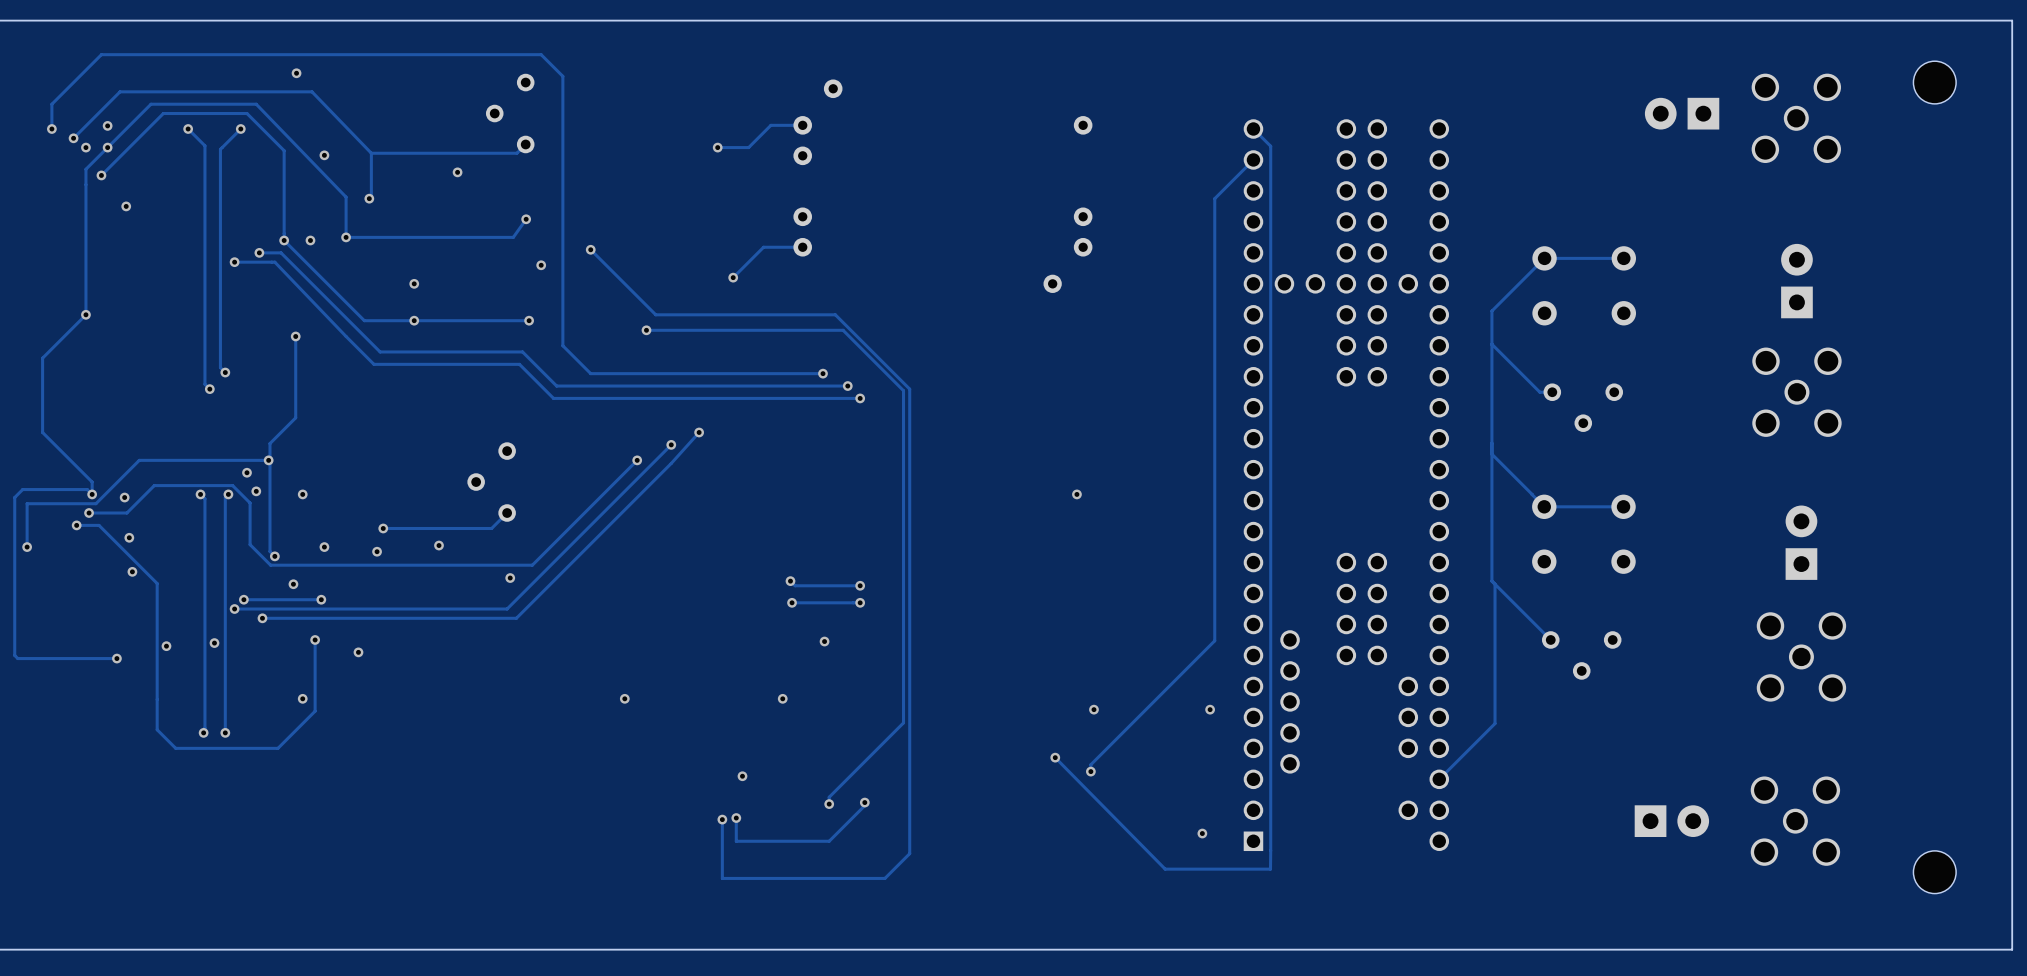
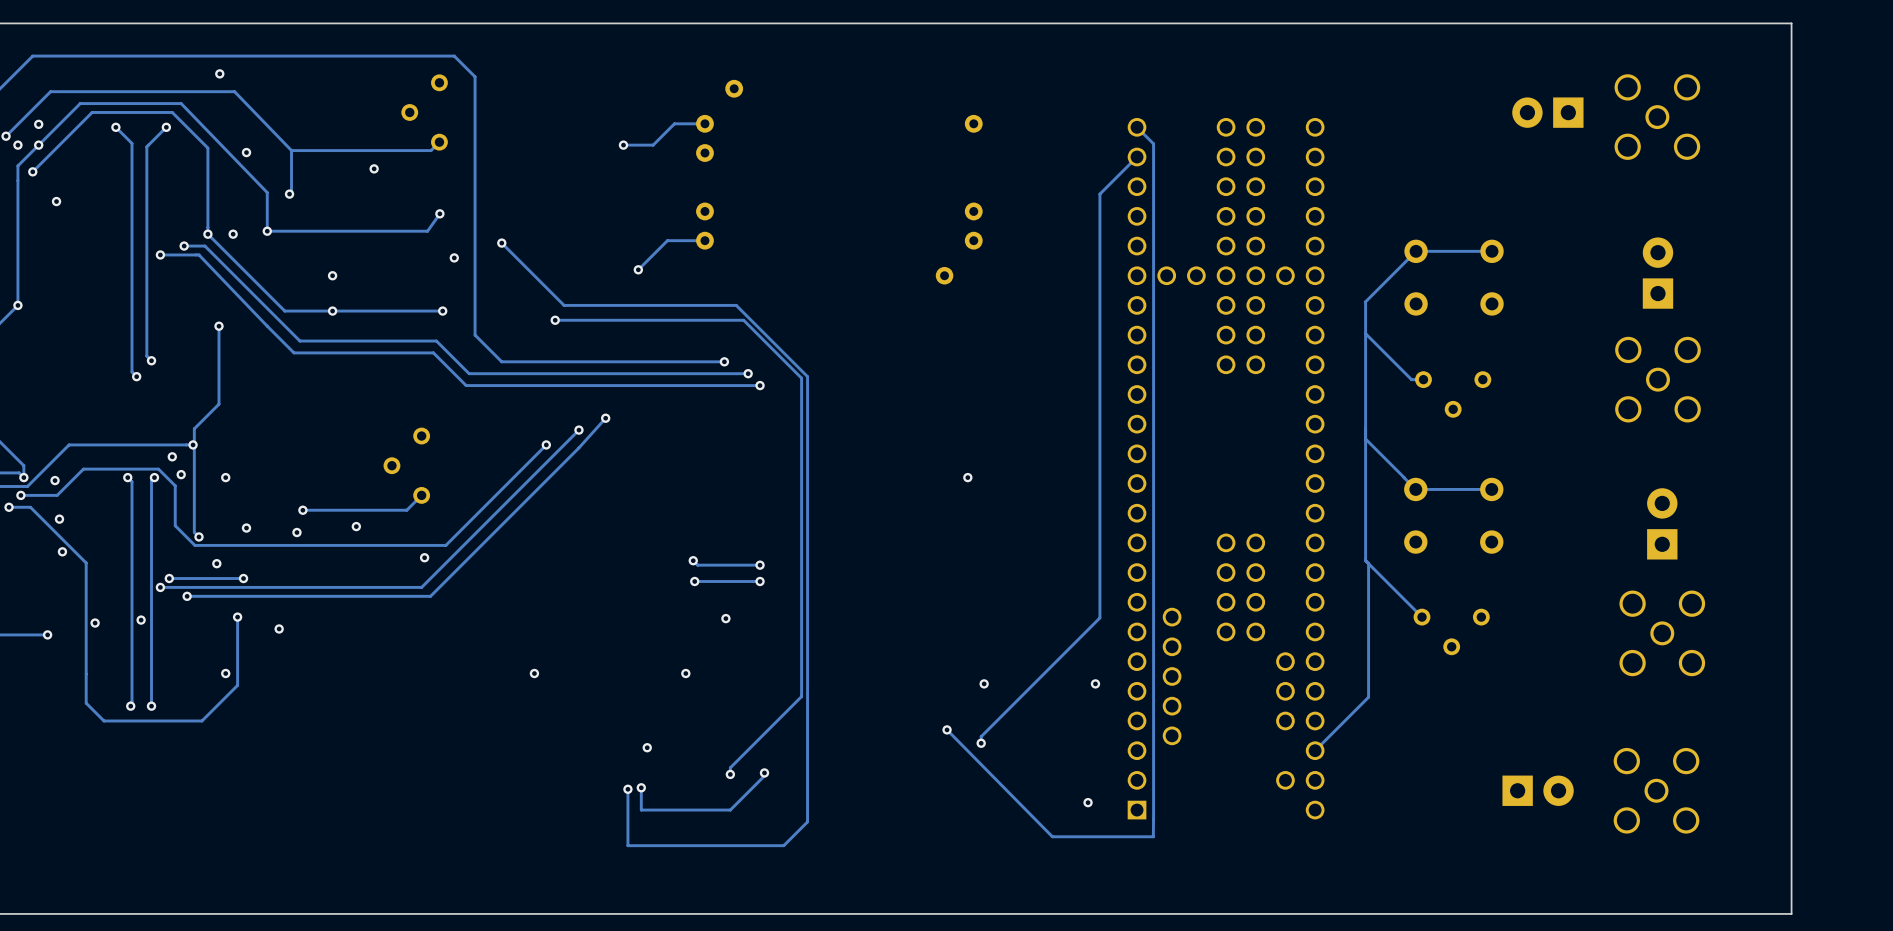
board edge: (1936, 20) (2012, 20) (2012, 949) (1936, 949) -> (1791, 23) (1791, 913)
part: (1934, 82) -> none
part: (1934, 872) -> none

